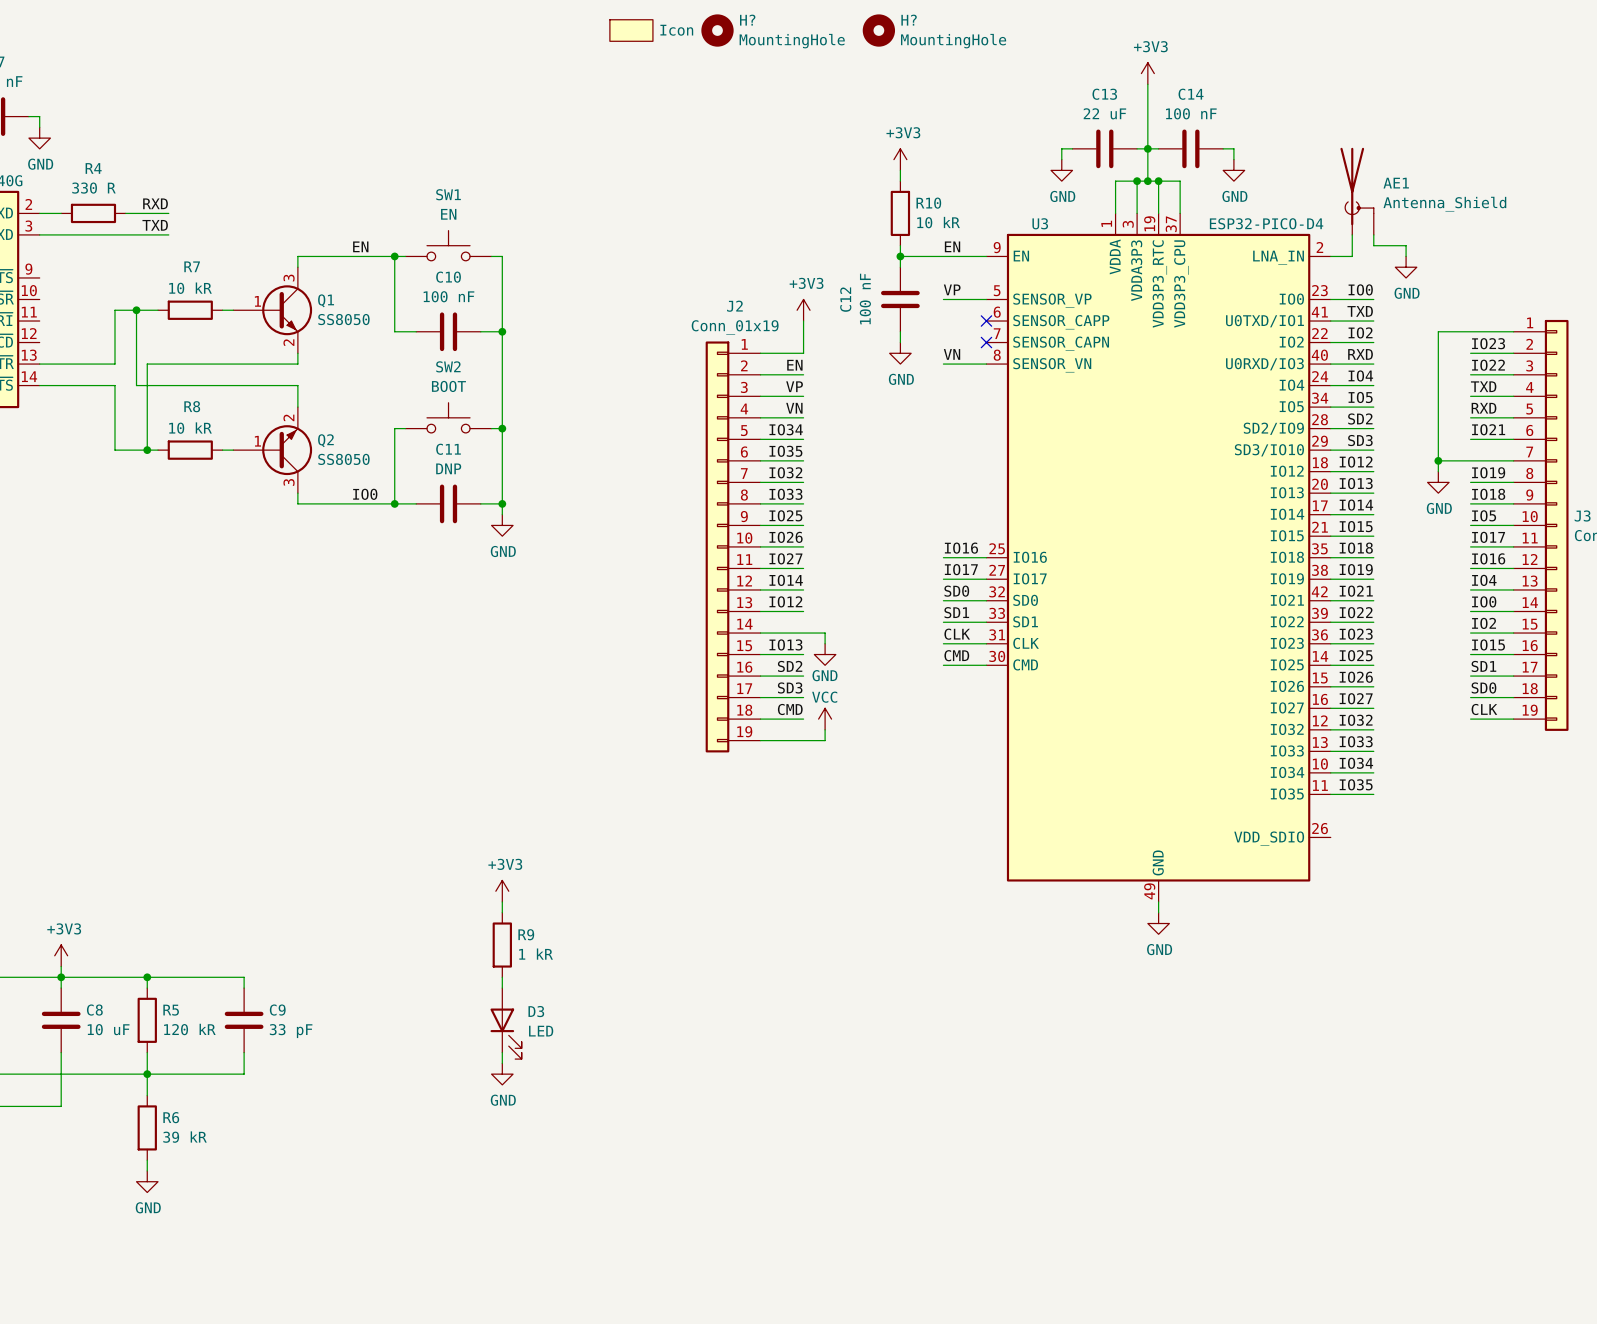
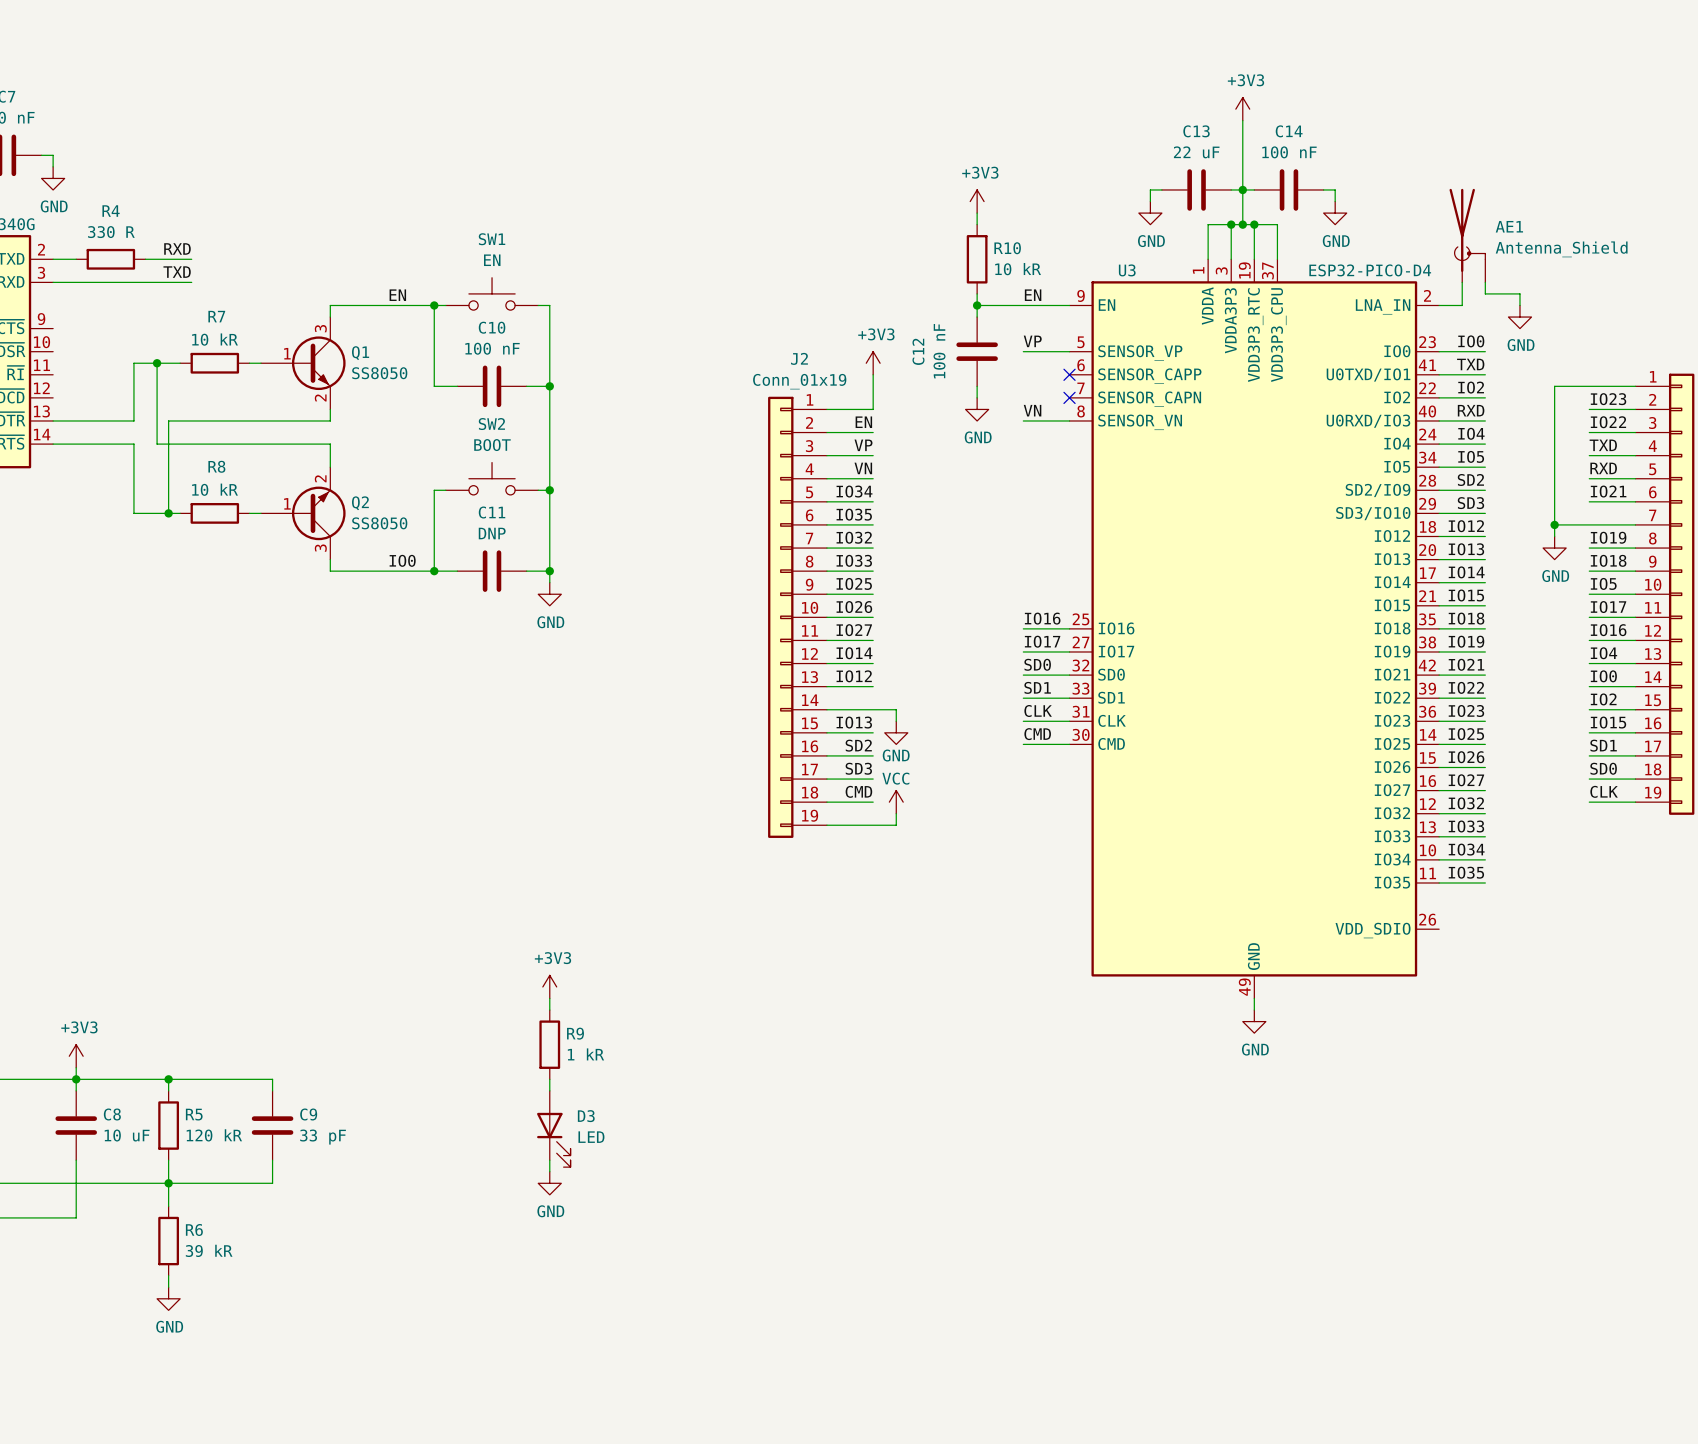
part: Icon (631, 30) -> none
H?: MountingHole (717, 30) -> none
H?: MountingHole (878, 30) -> none

